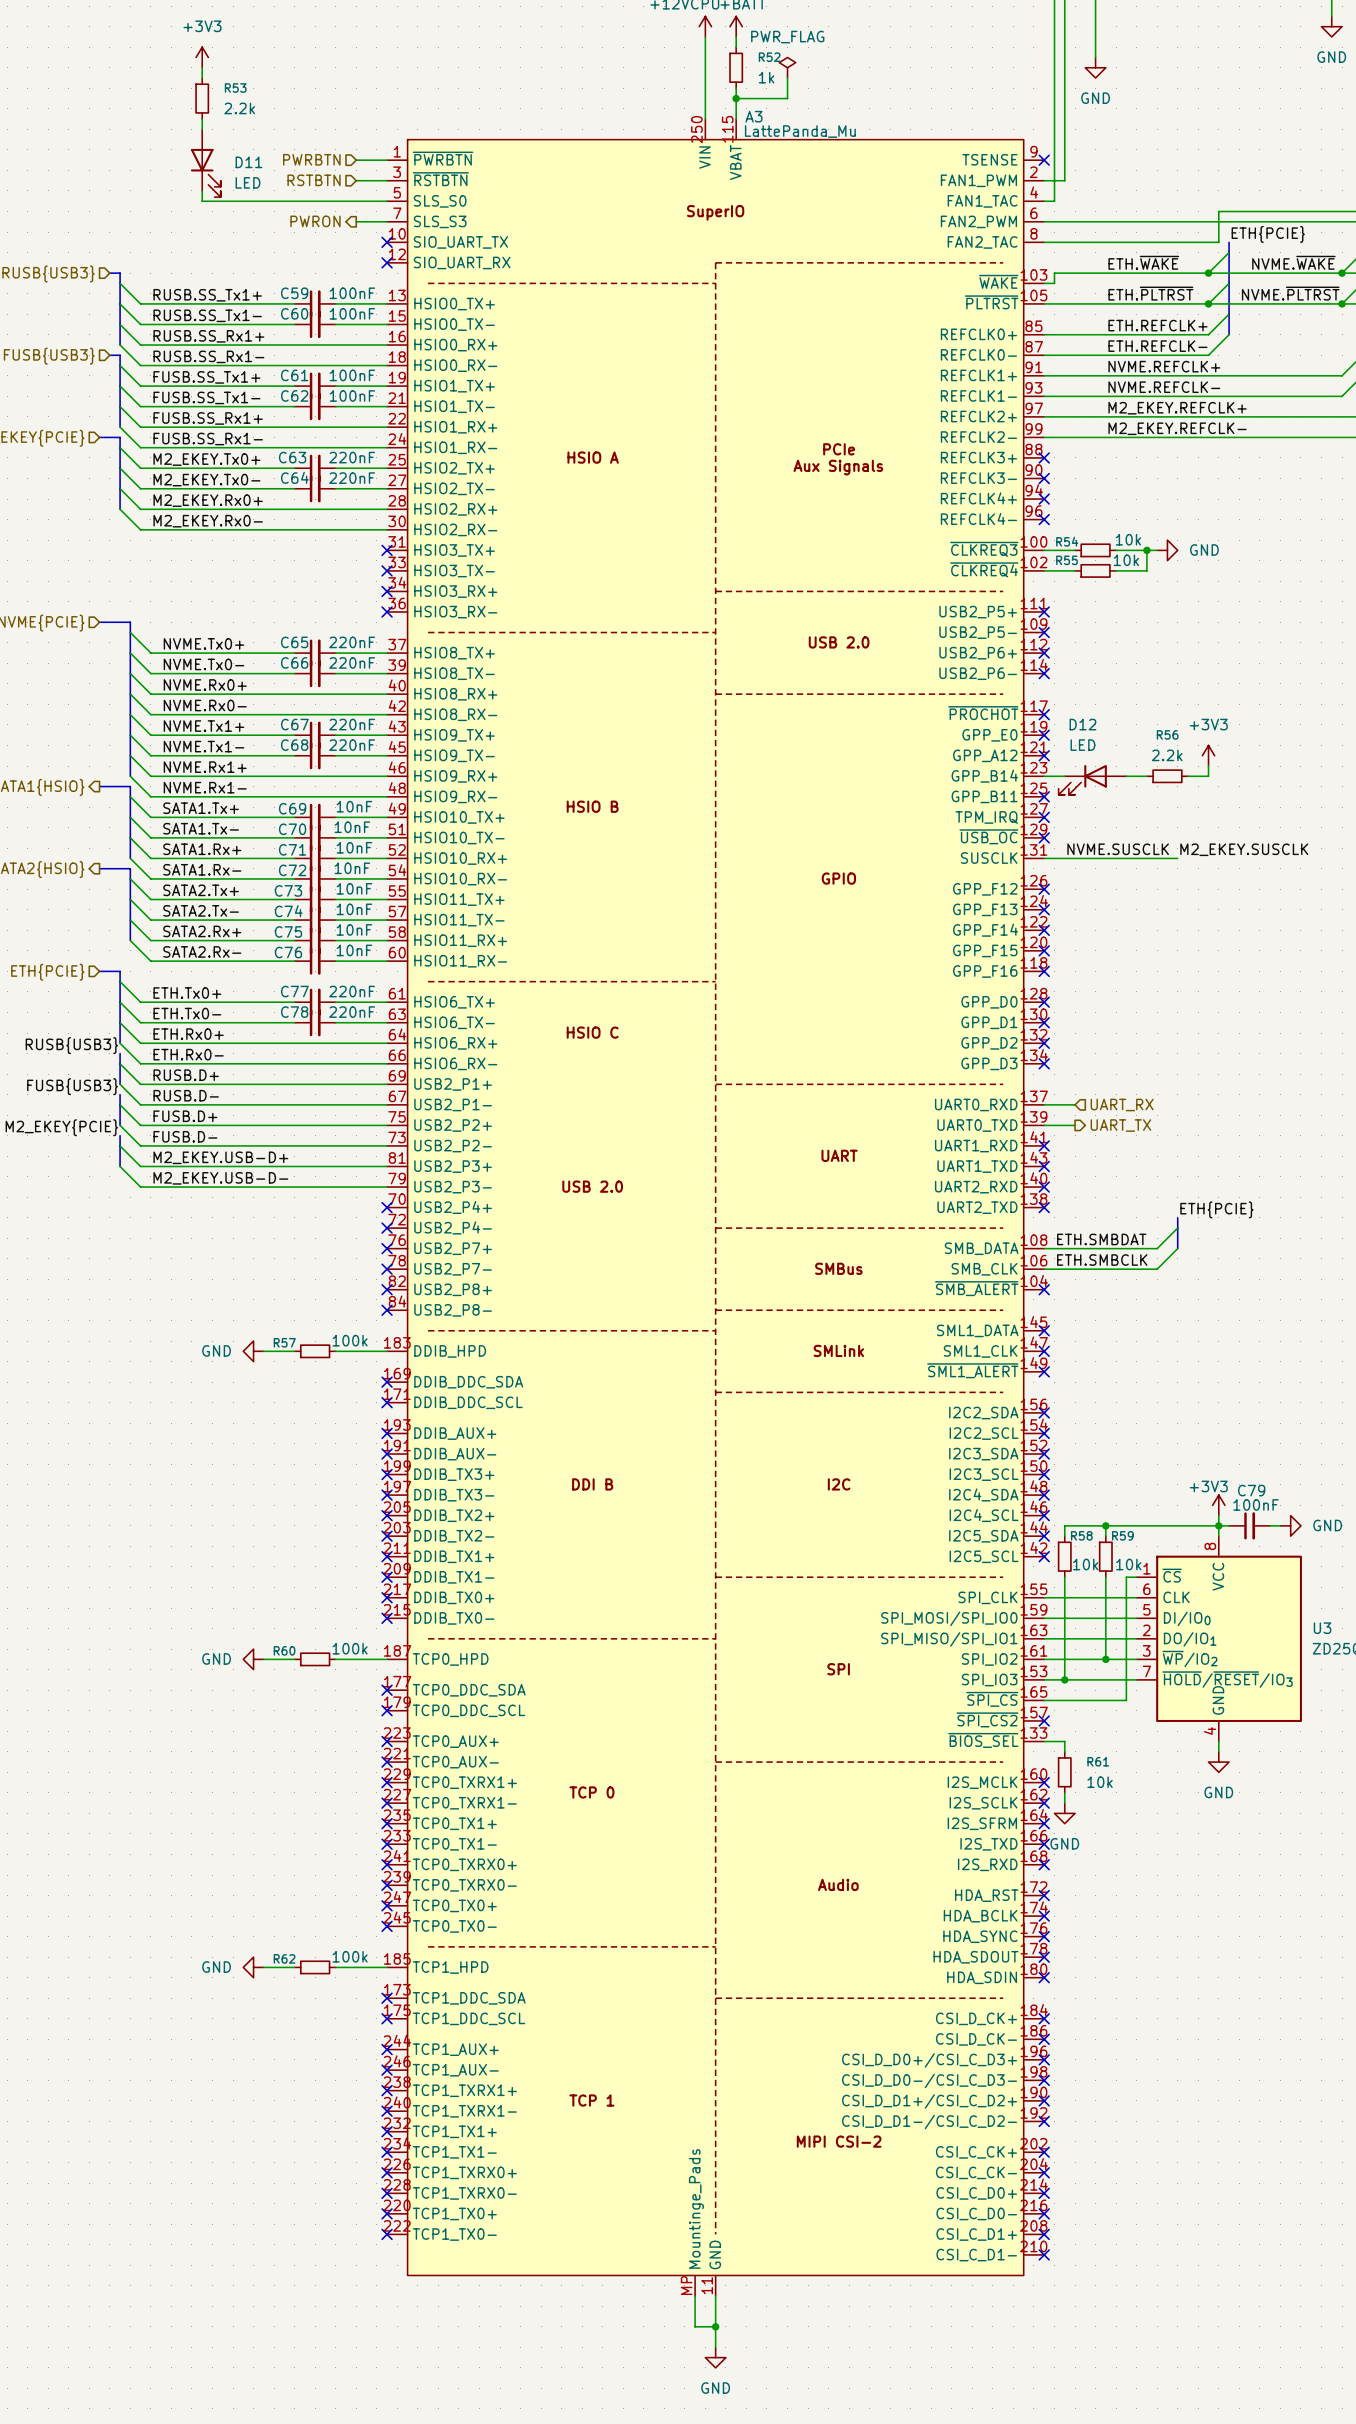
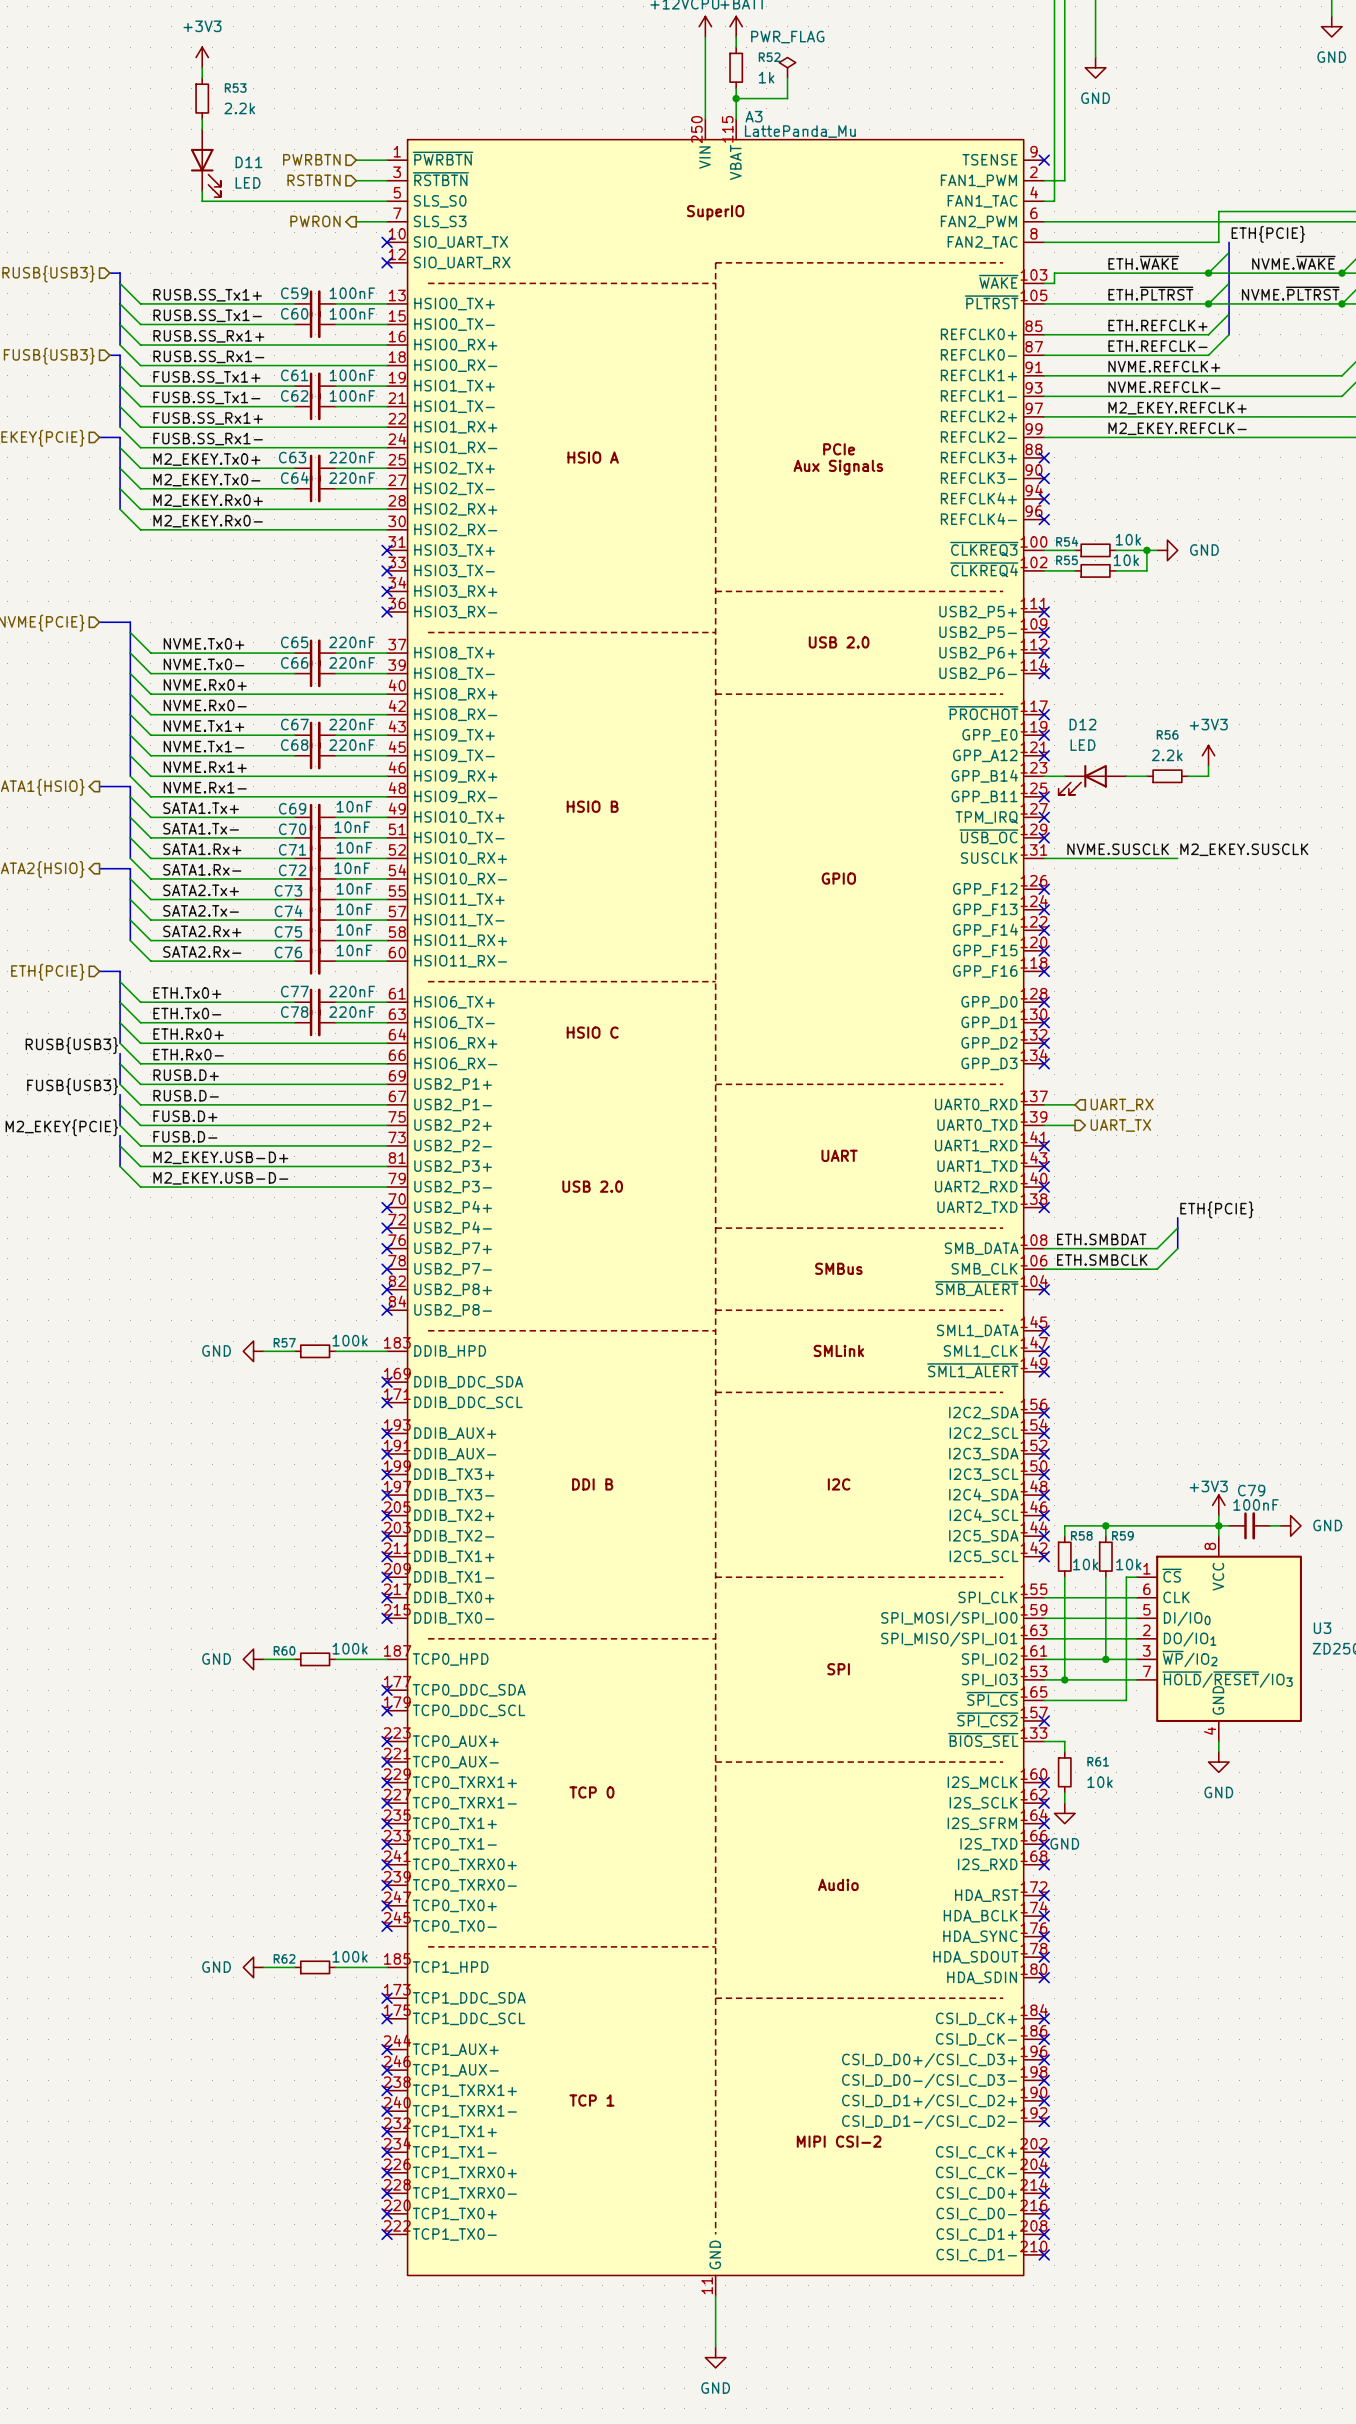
A3 symbol: [387, 119, 1045, 2297] -> [387, 119, 1045, 2297]
wire: (695, 2296) (695, 2326) (715, 2326) -> none
junction: (715, 2326) -> none

